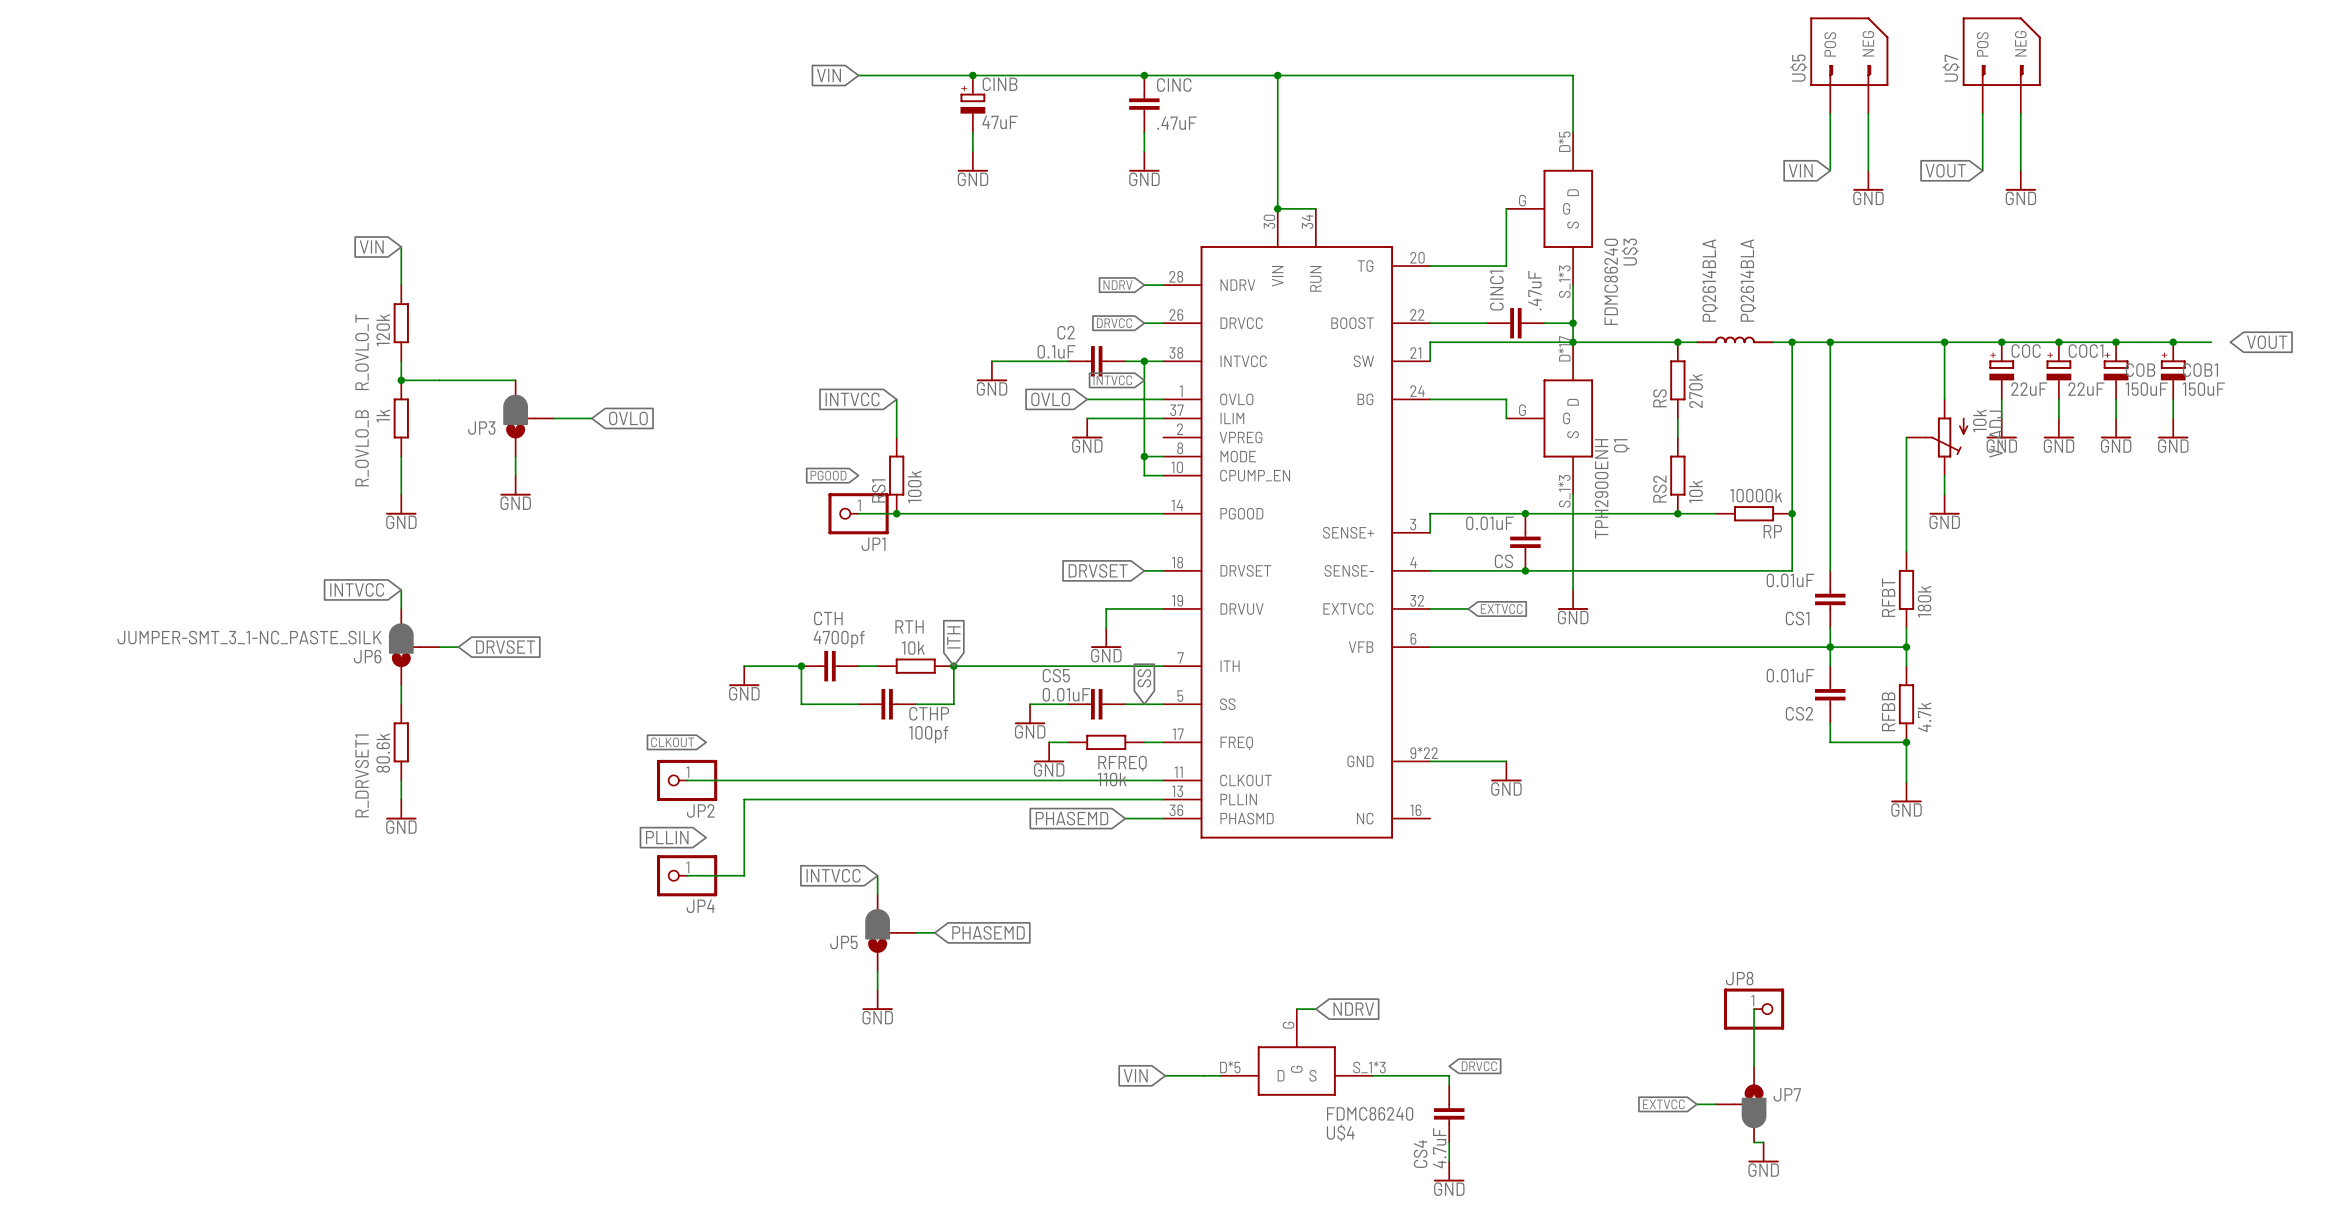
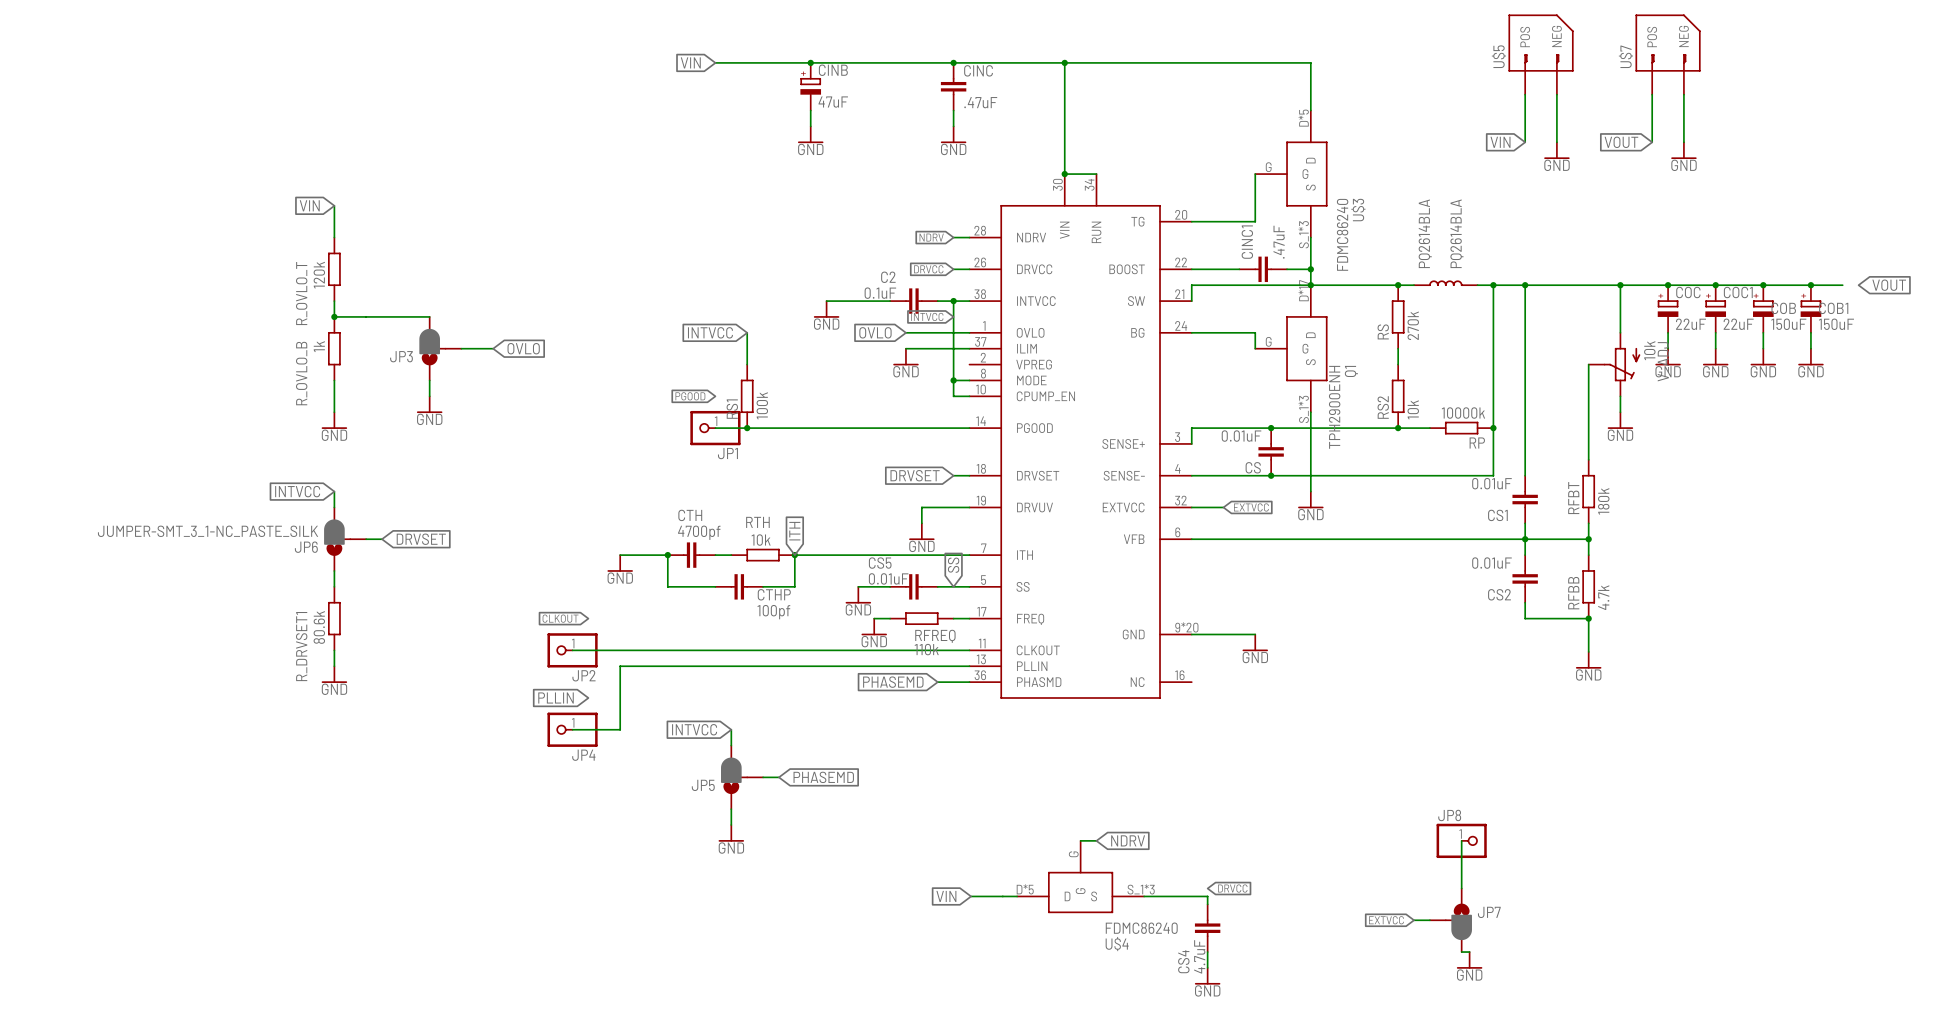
part pin number: 9*22 (1424, 752) -> 9*20 (1186, 627)

